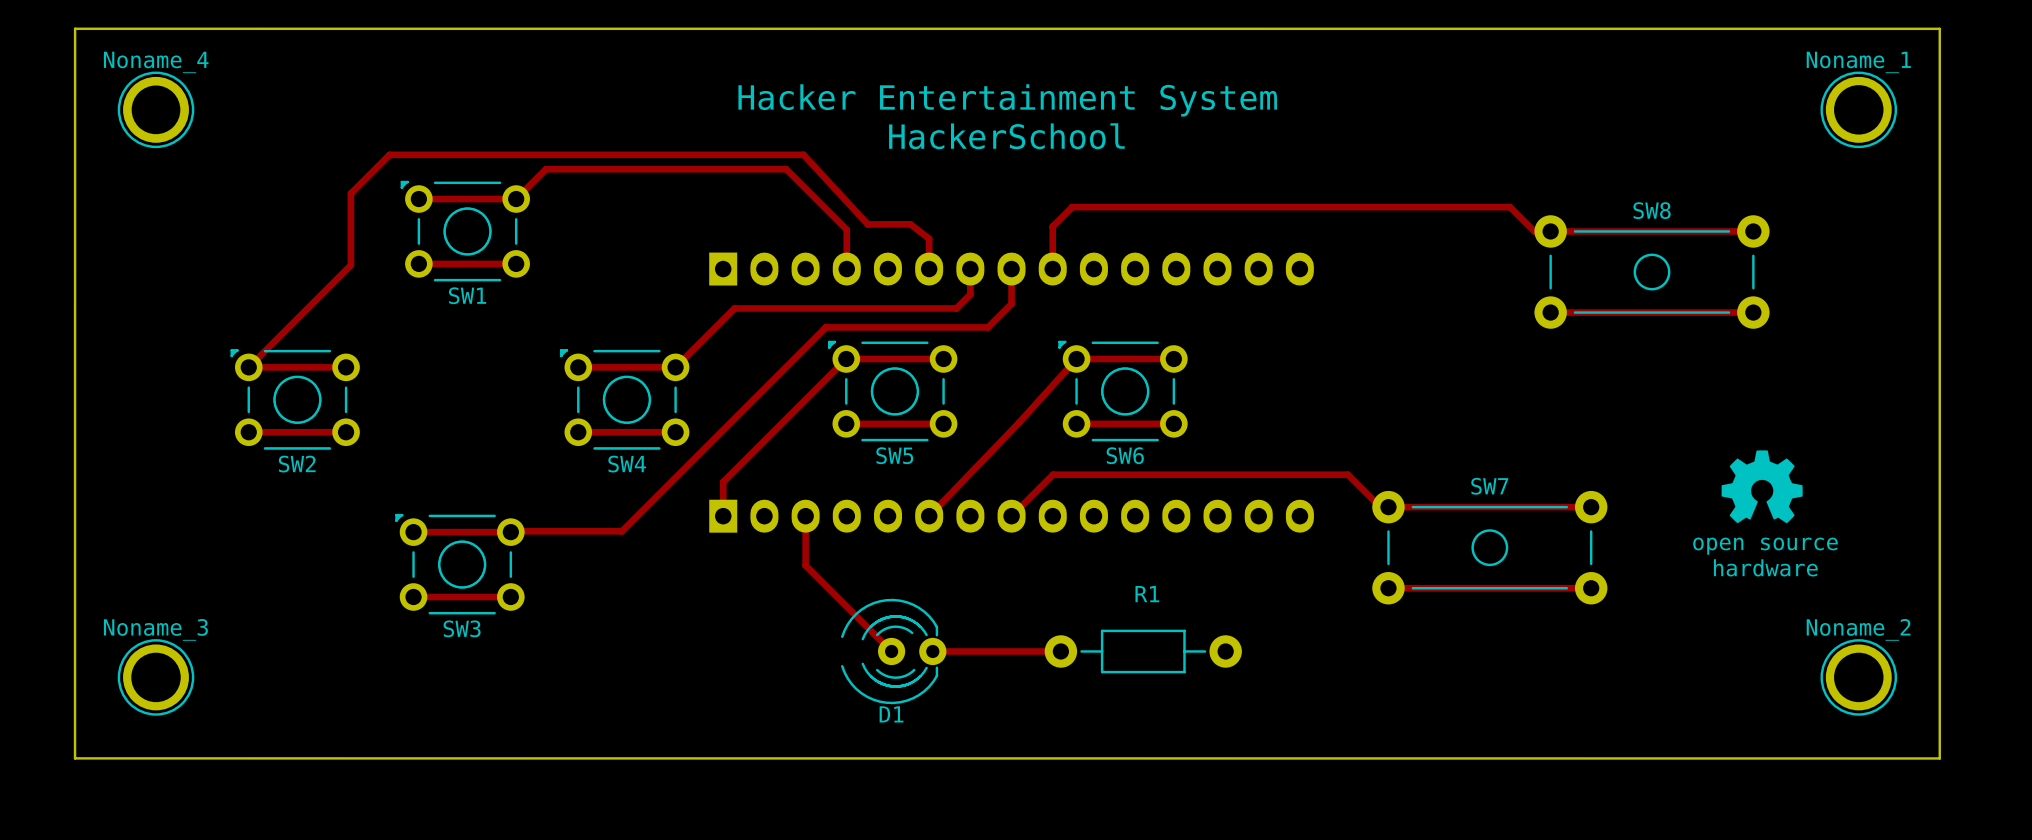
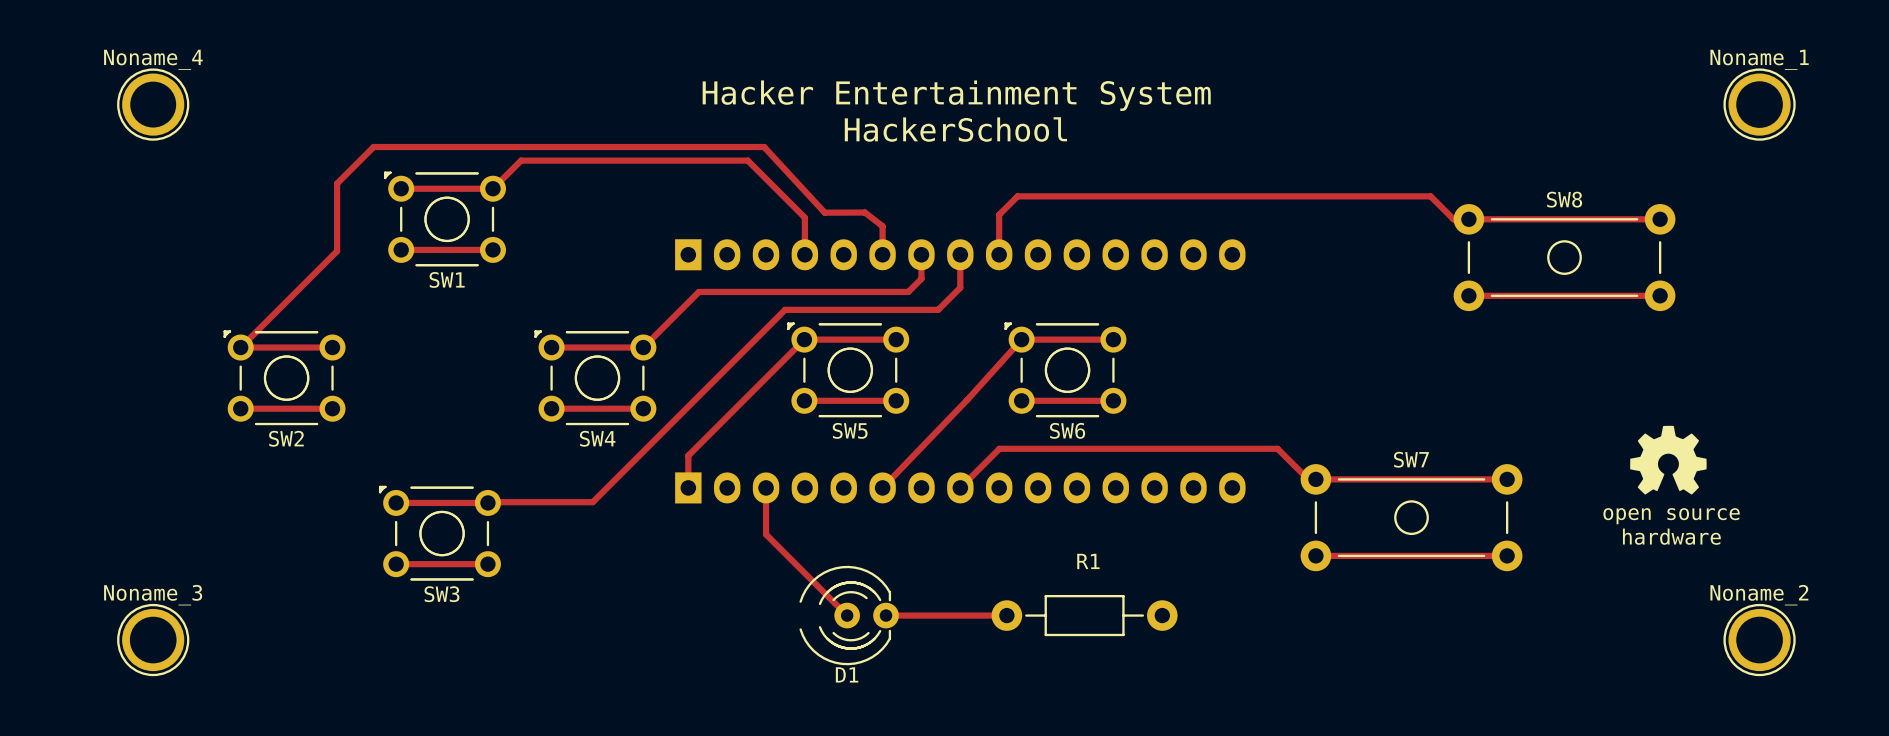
board edge: (75, 28) (75, 758) (1939, 758) (1939, 28) (75, 28) -> none

